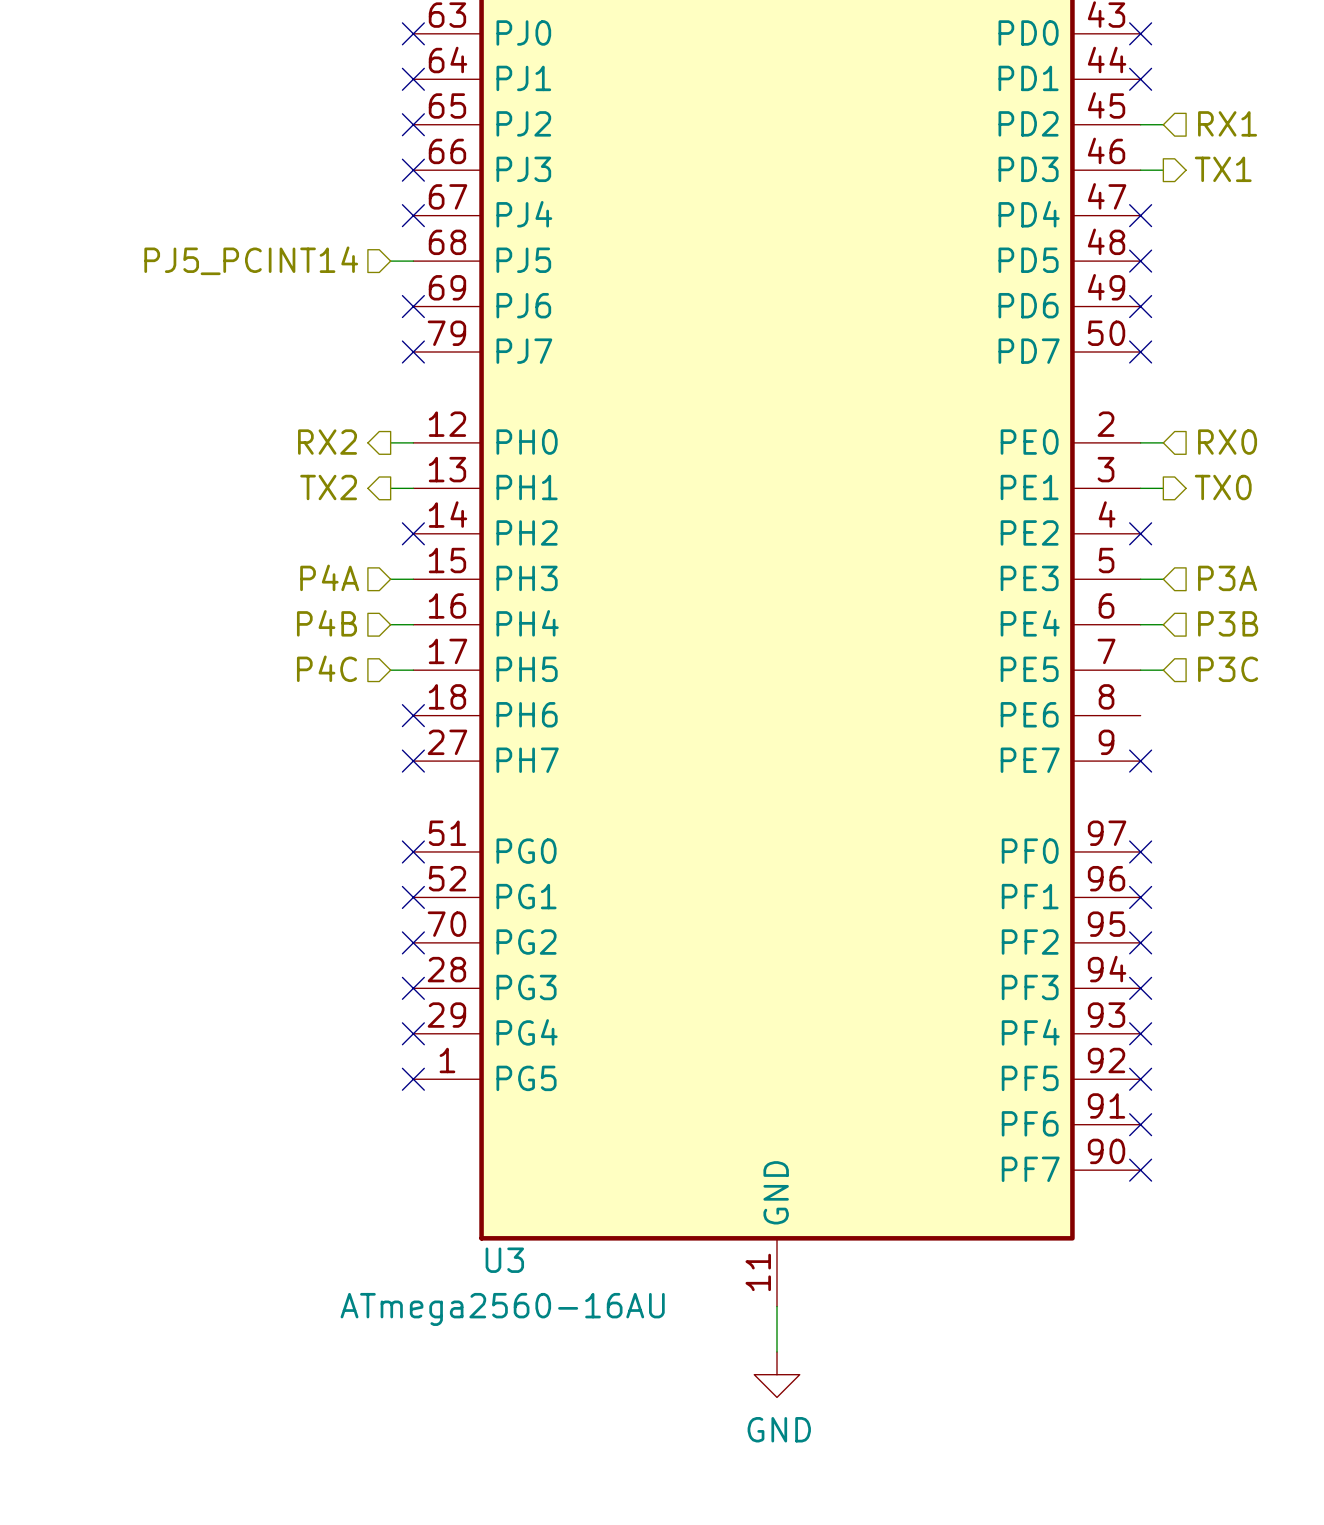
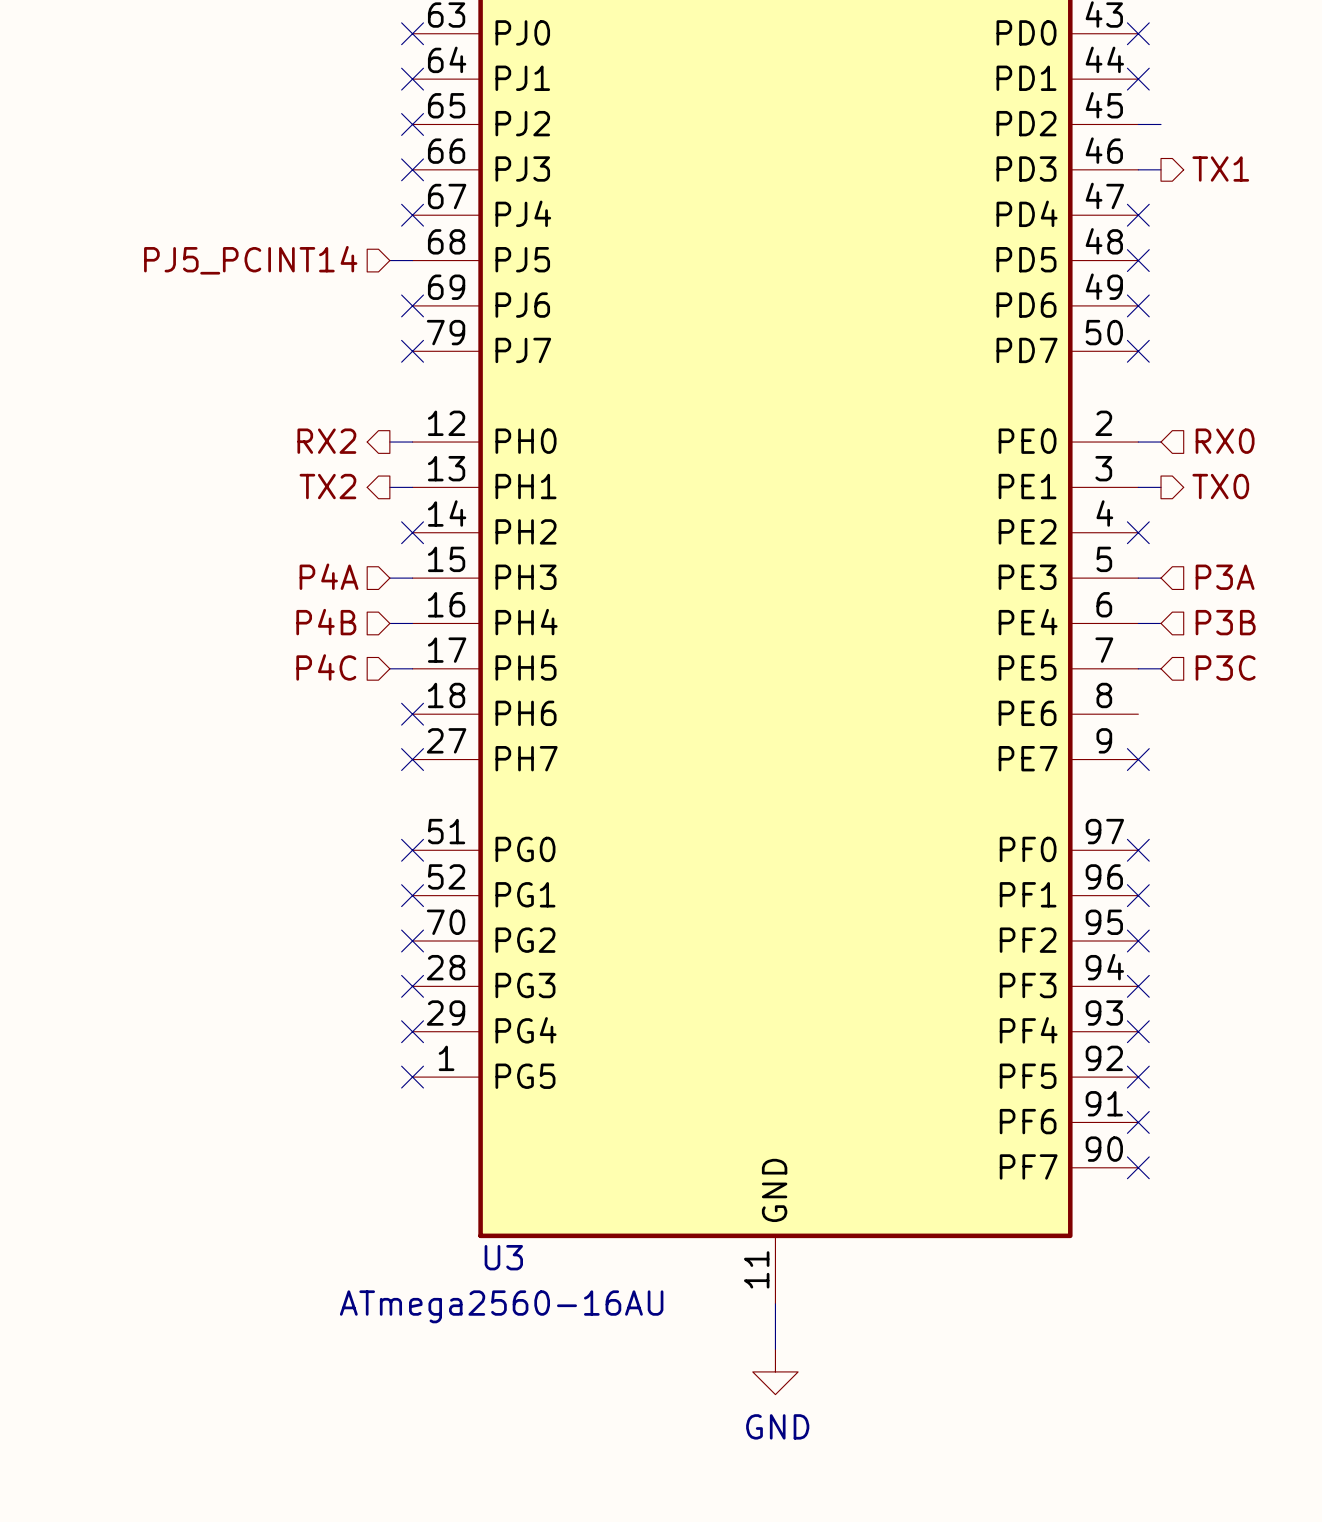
hierarchical label: RX1 (1227, 123) -> none

